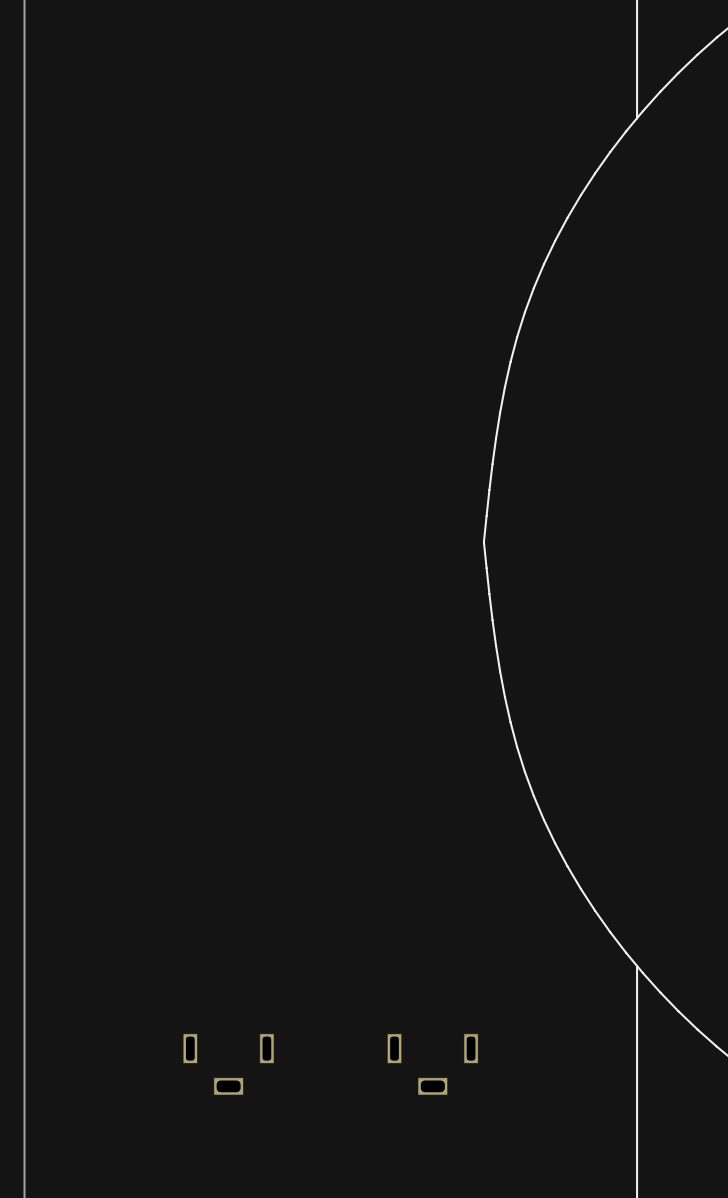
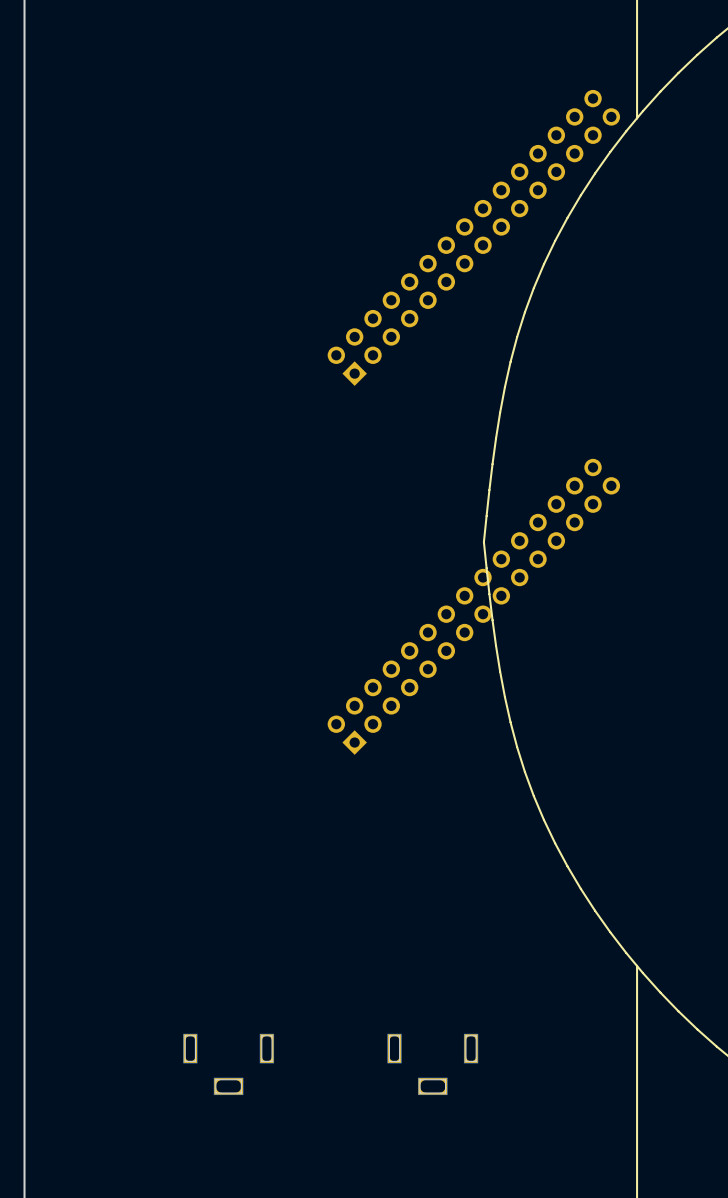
part: none -> (473, 237)
part: none -> (473, 606)

